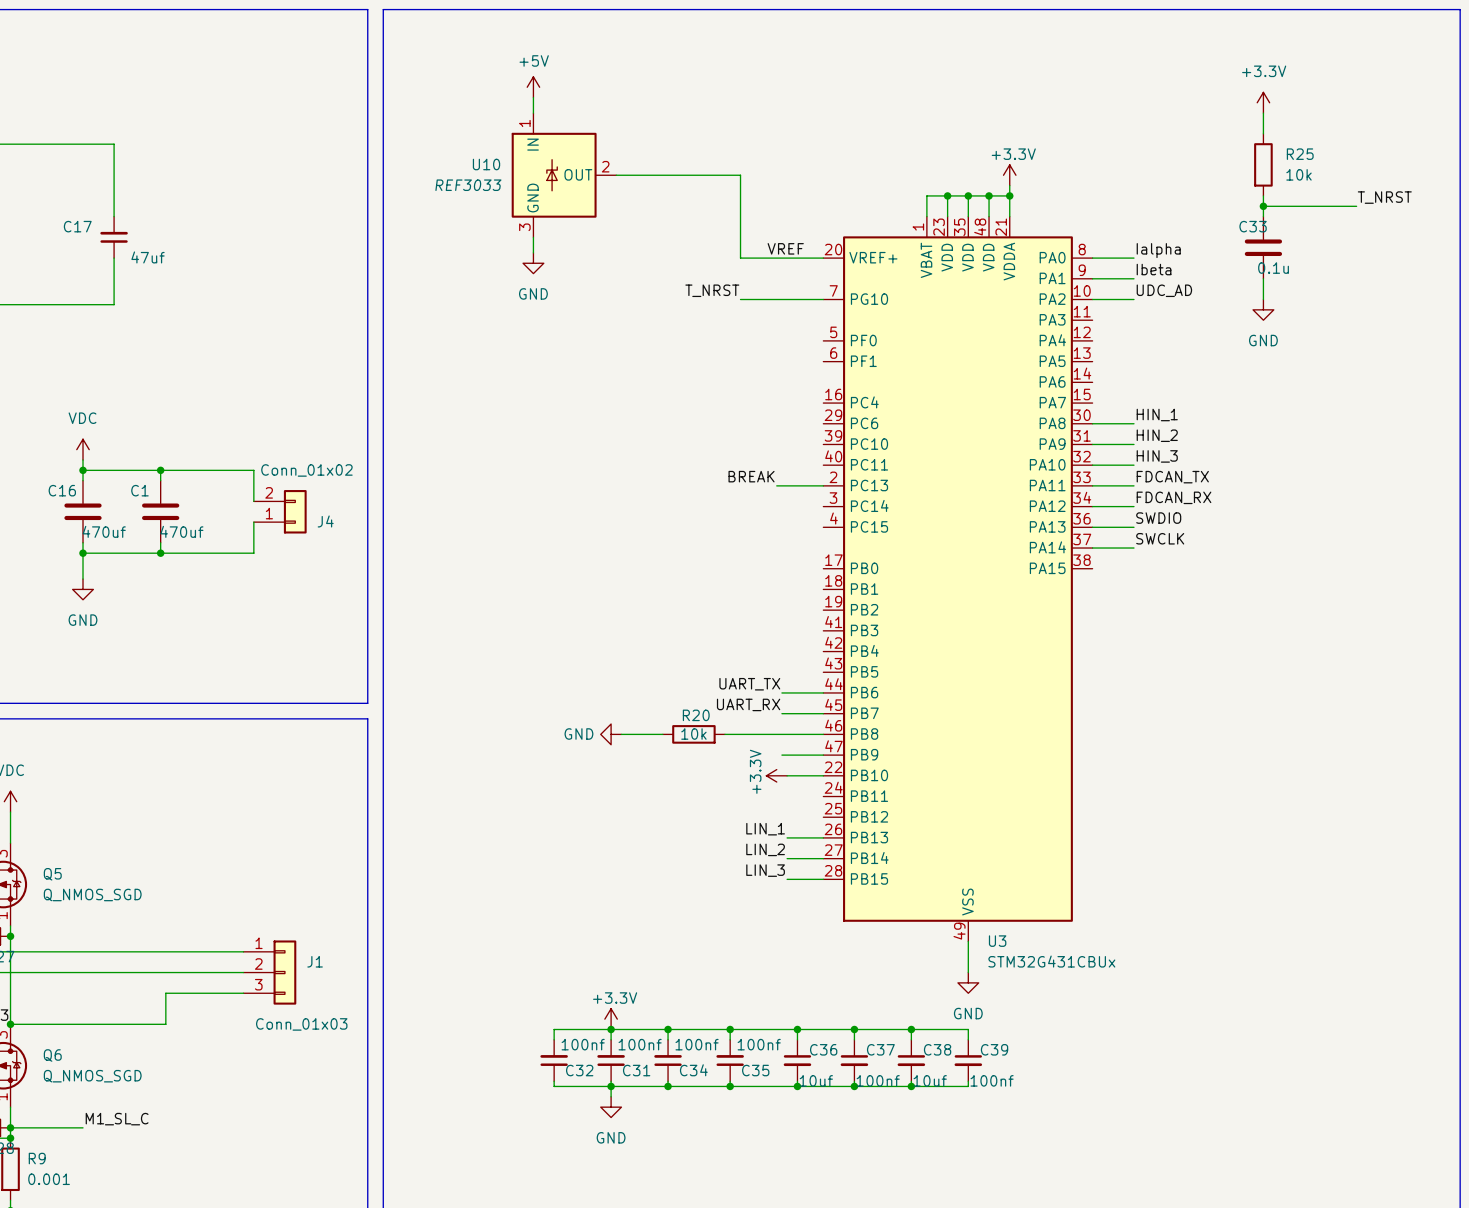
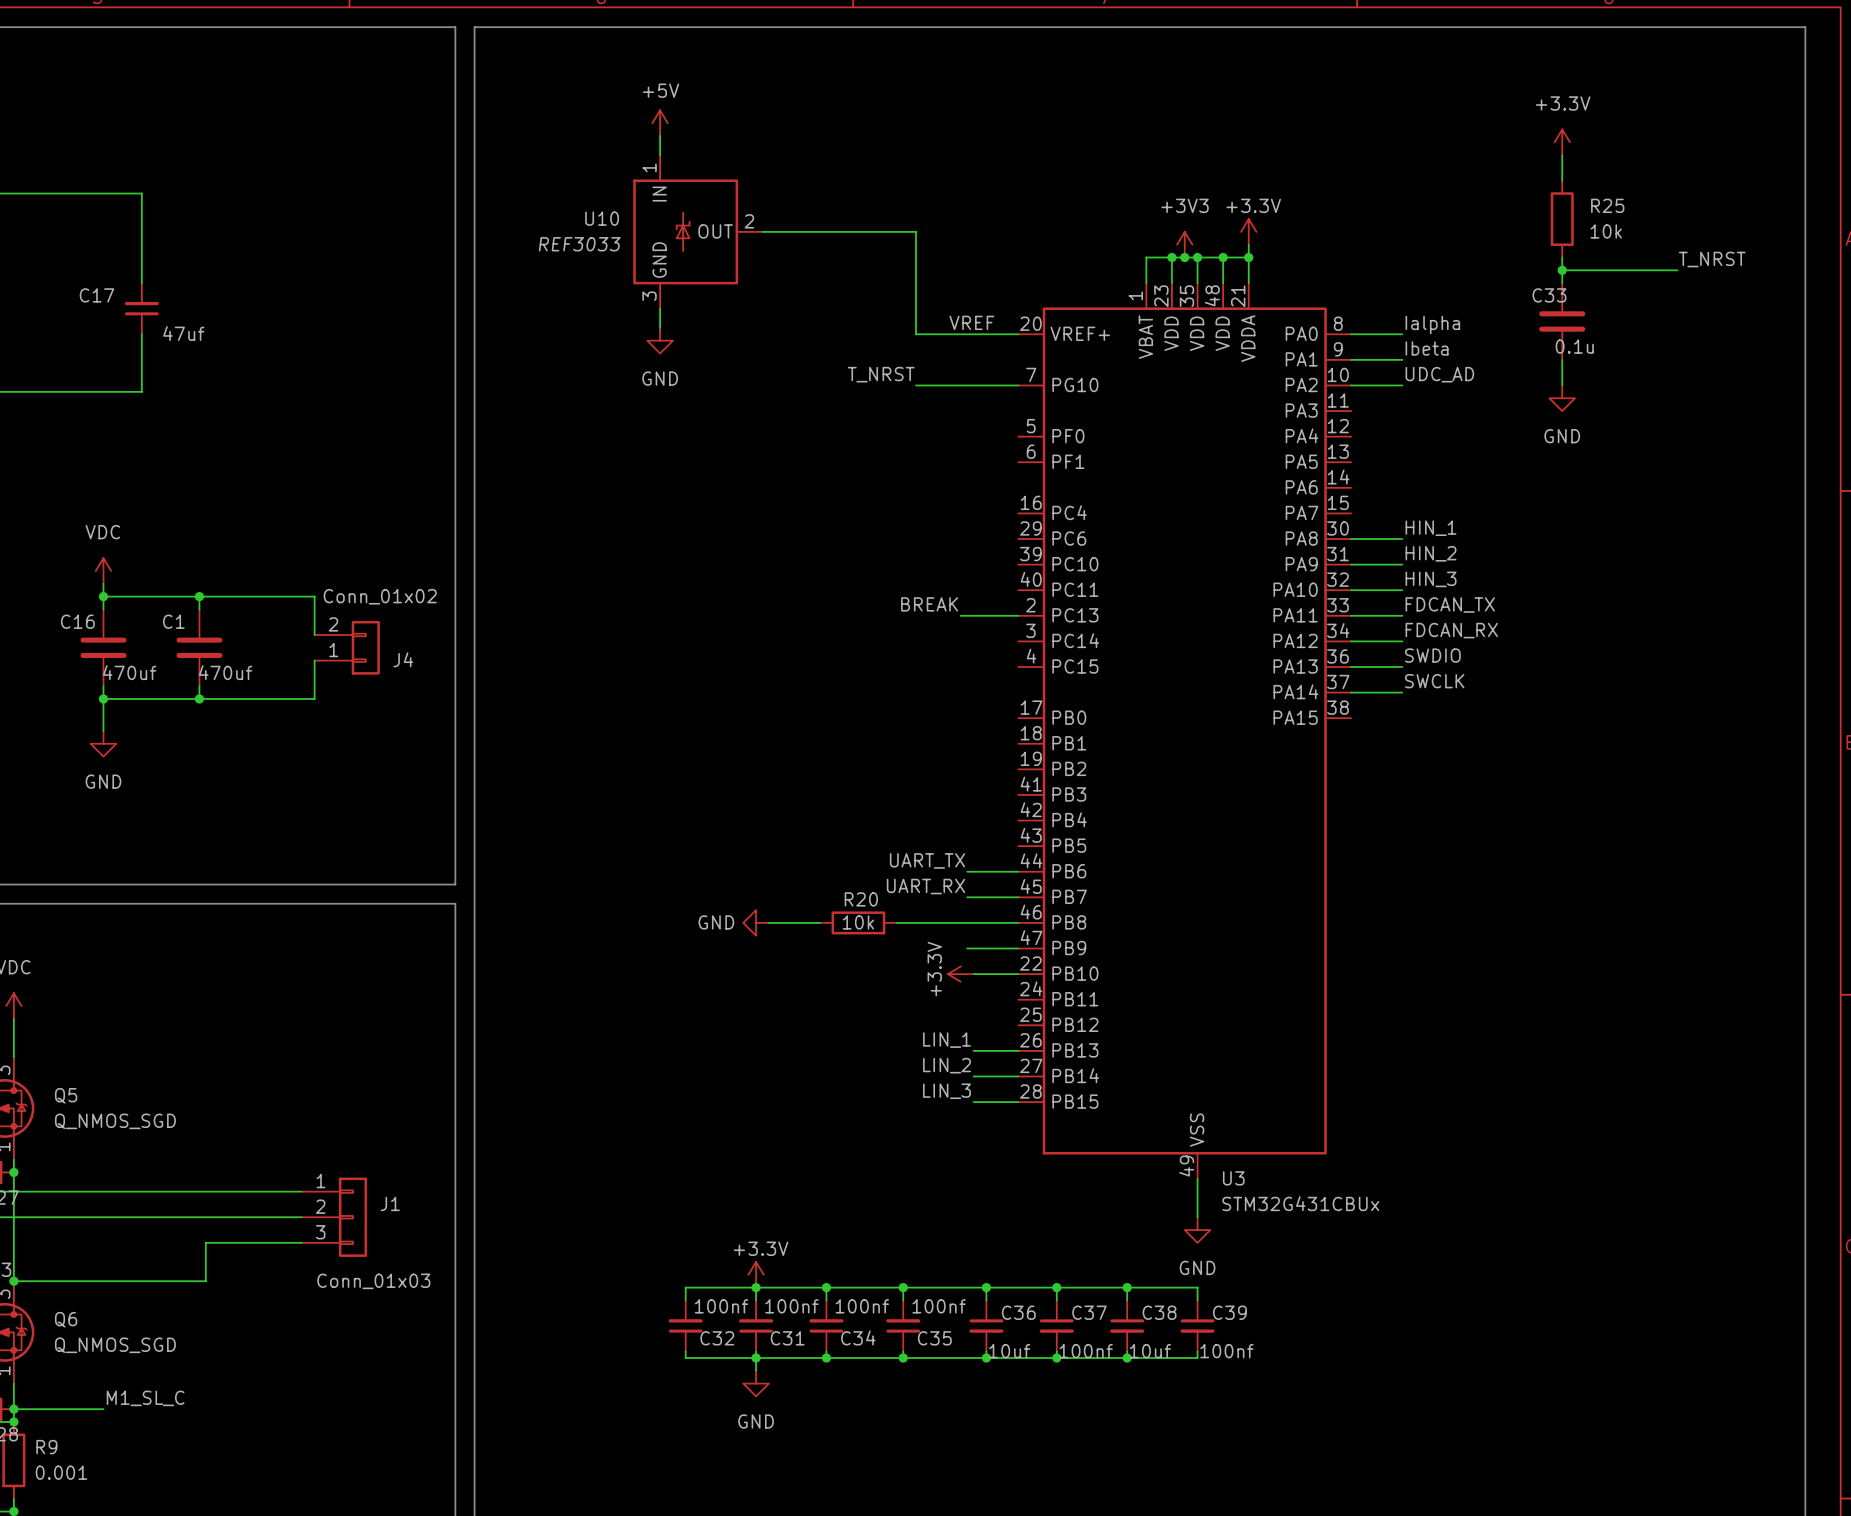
power symbol: none -> +3V3 (1184, 244)
junction: none -> (1184, 257)

